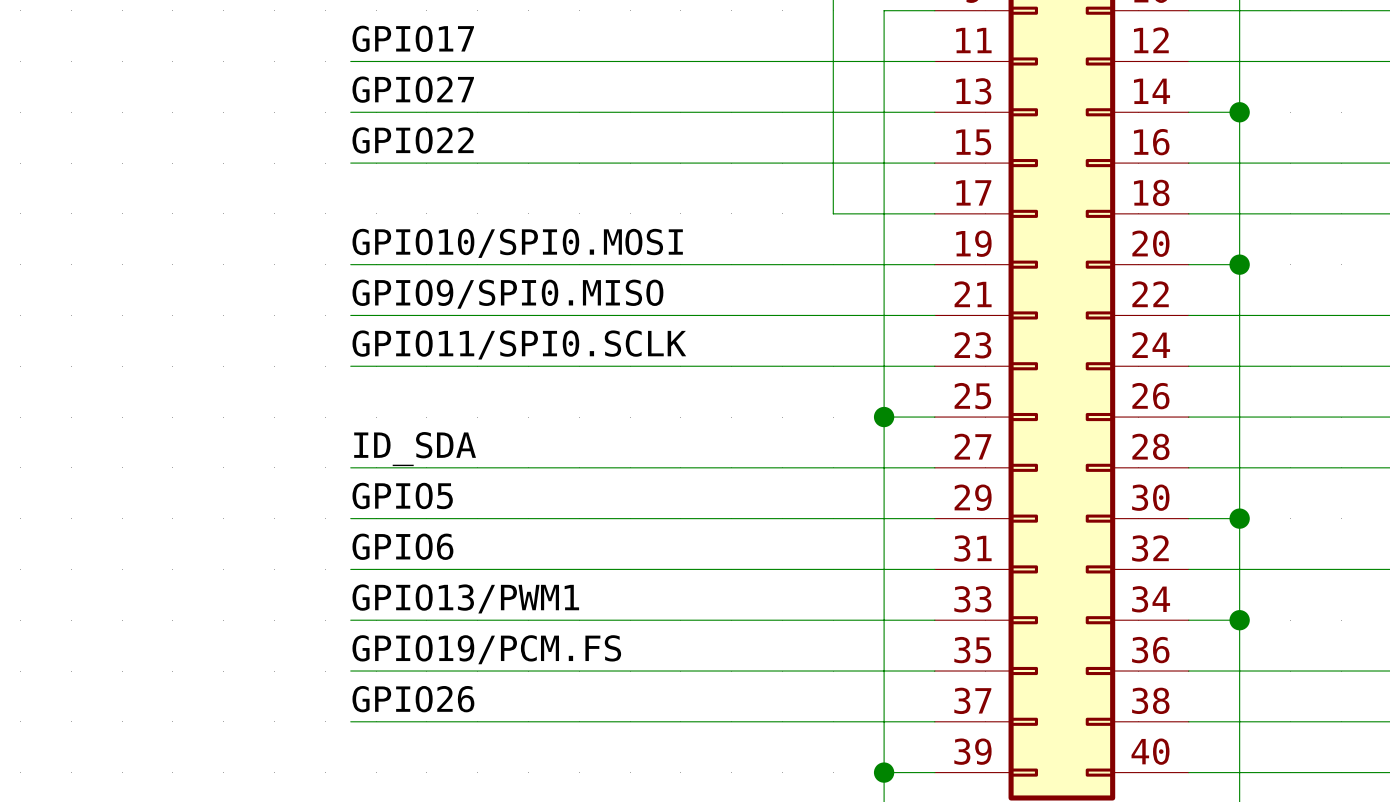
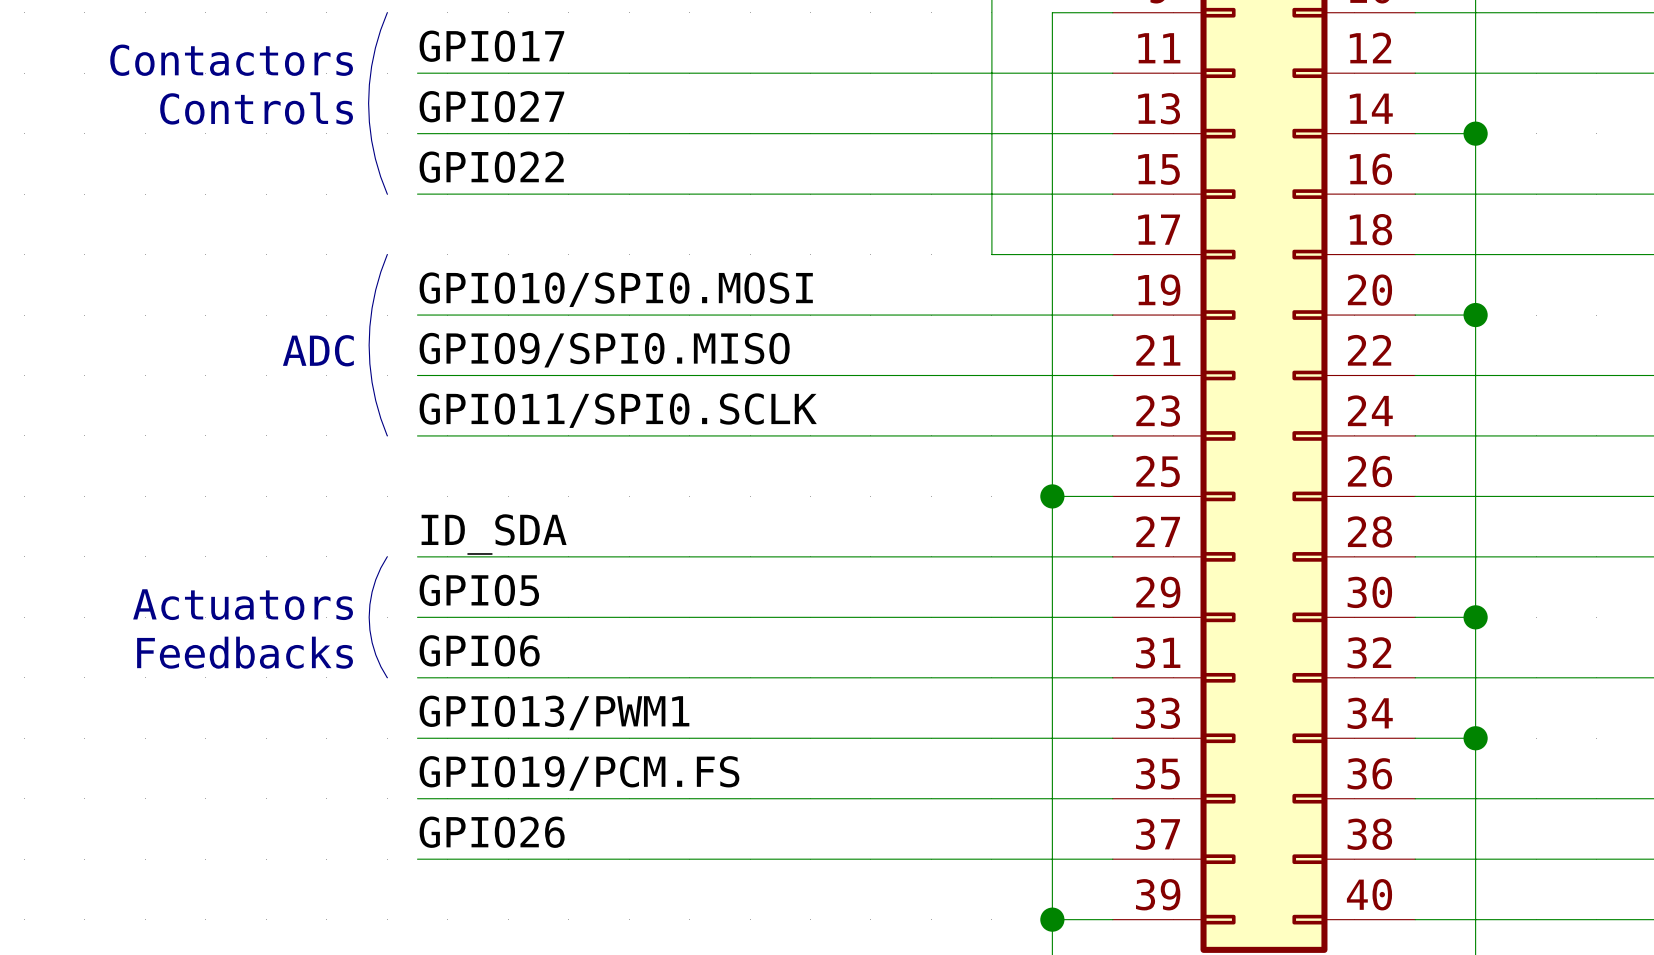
line: none -> (387, 12) (375, 48) (371, 66) (368, 103) (369, 122) (375, 158) (387, 194)
text: none -> Contactors (231, 60)
text: none -> Controls (256, 108)
line: none -> (387, 254) (372, 308) (369, 345) (375, 400) (387, 435)
text: none -> ADC (318, 350)
line: none -> (387, 556) (375, 579) (369, 617) (375, 654) (387, 677)
text: none -> Actuators (243, 604)
text: none -> Feedbacks (245, 652)

